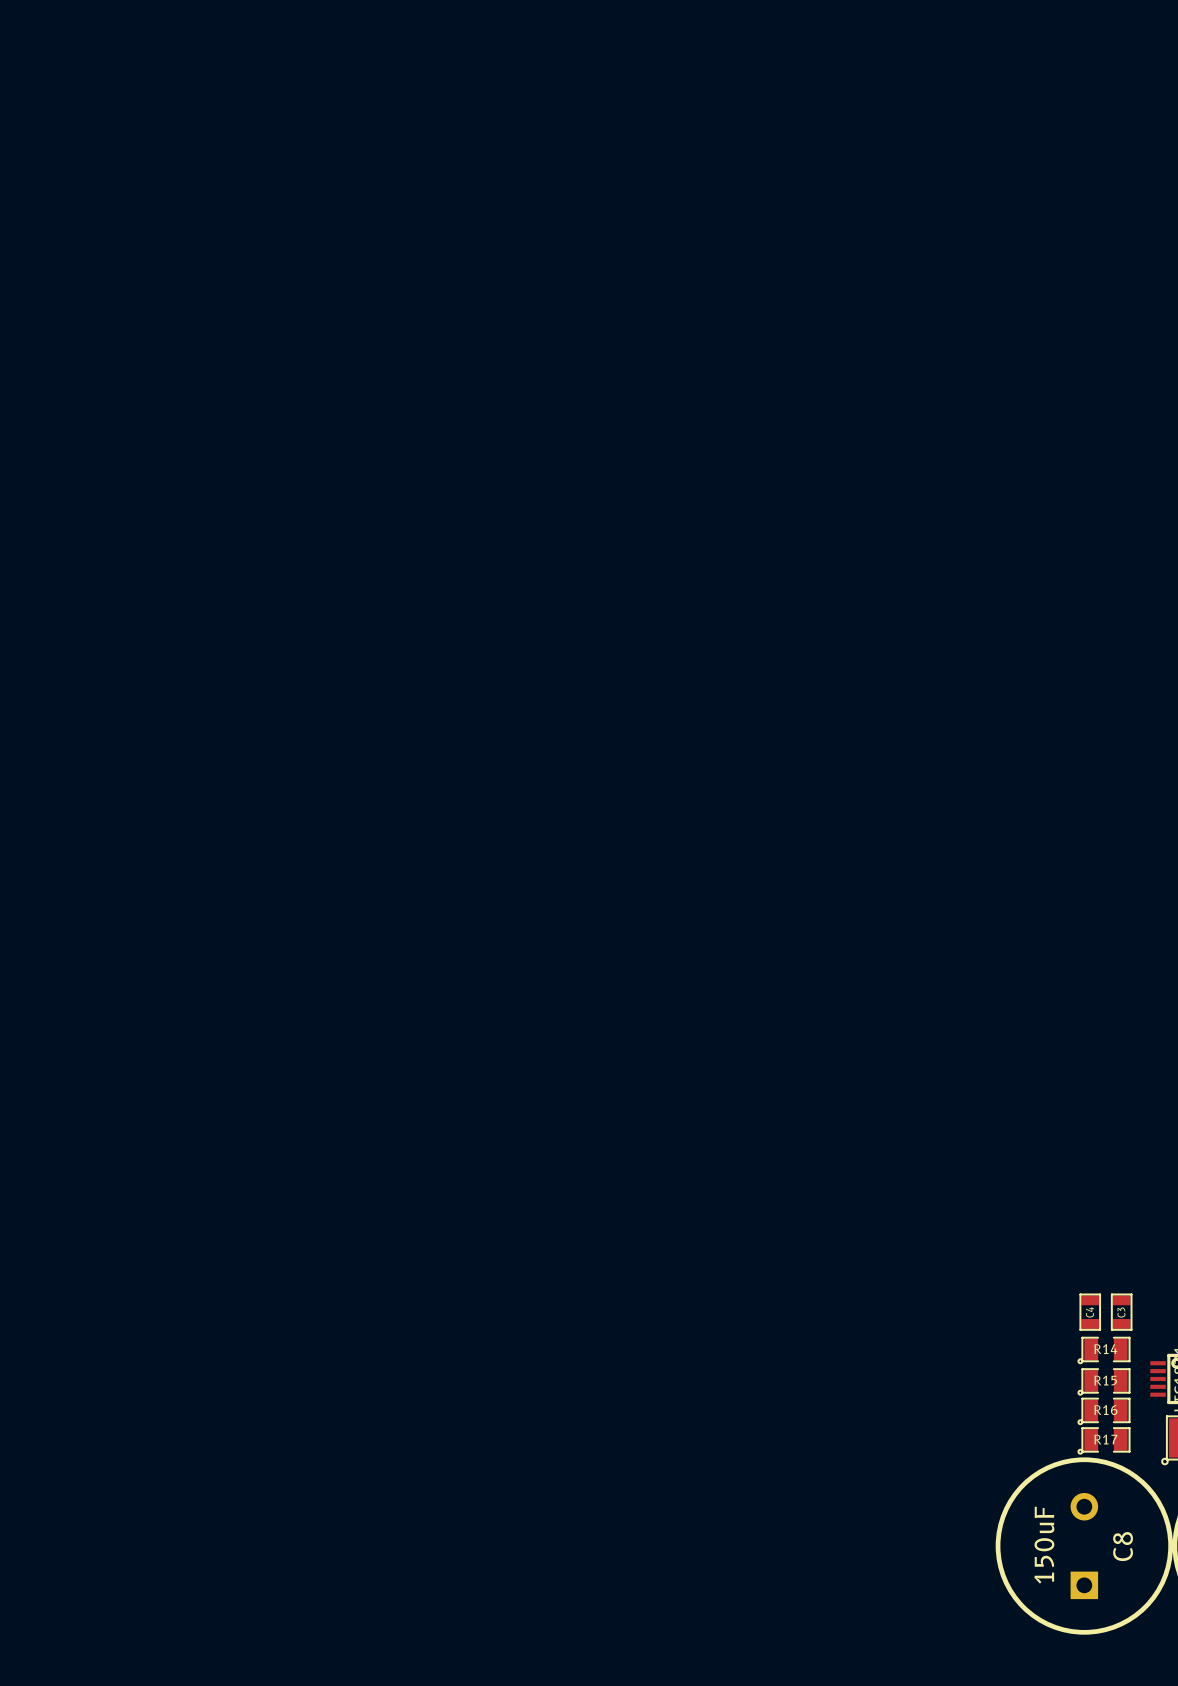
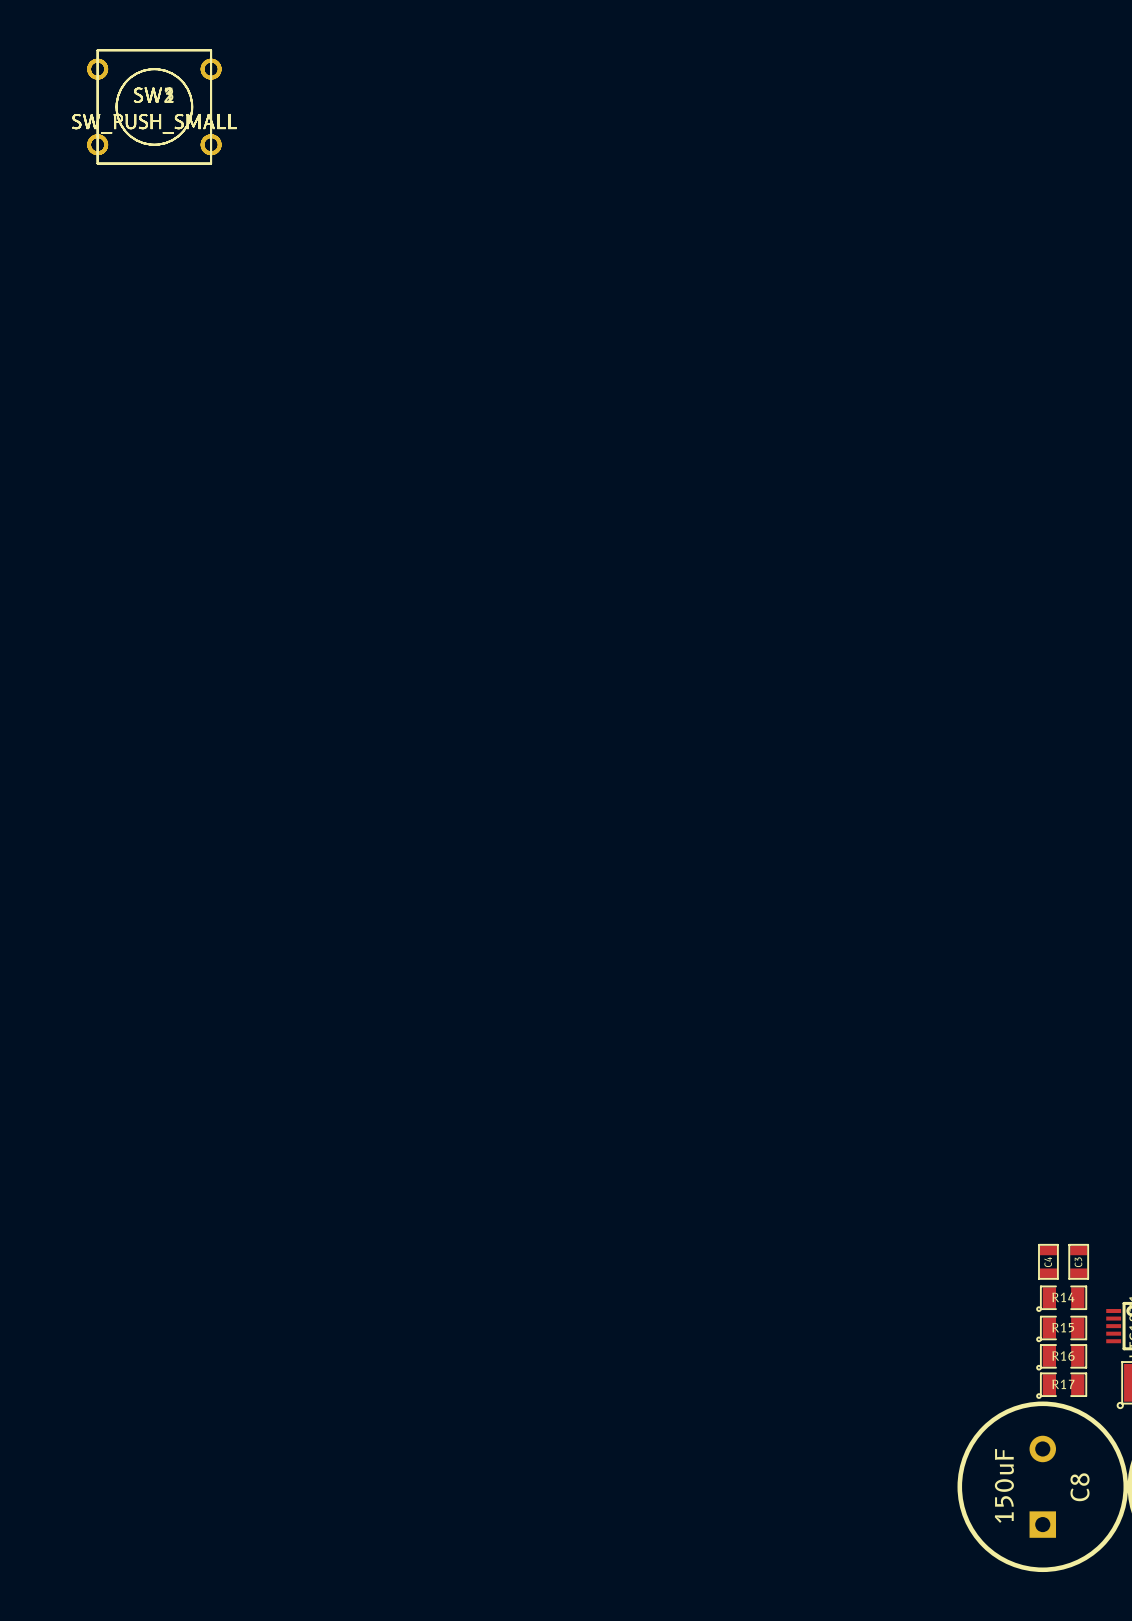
part: none -> SW_PUSH_SMALL (154, 106)
part: none -> SW_PUSH_SMALL (154, 106)
part: none -> SW_PUSH_SMALL (154, 106)

